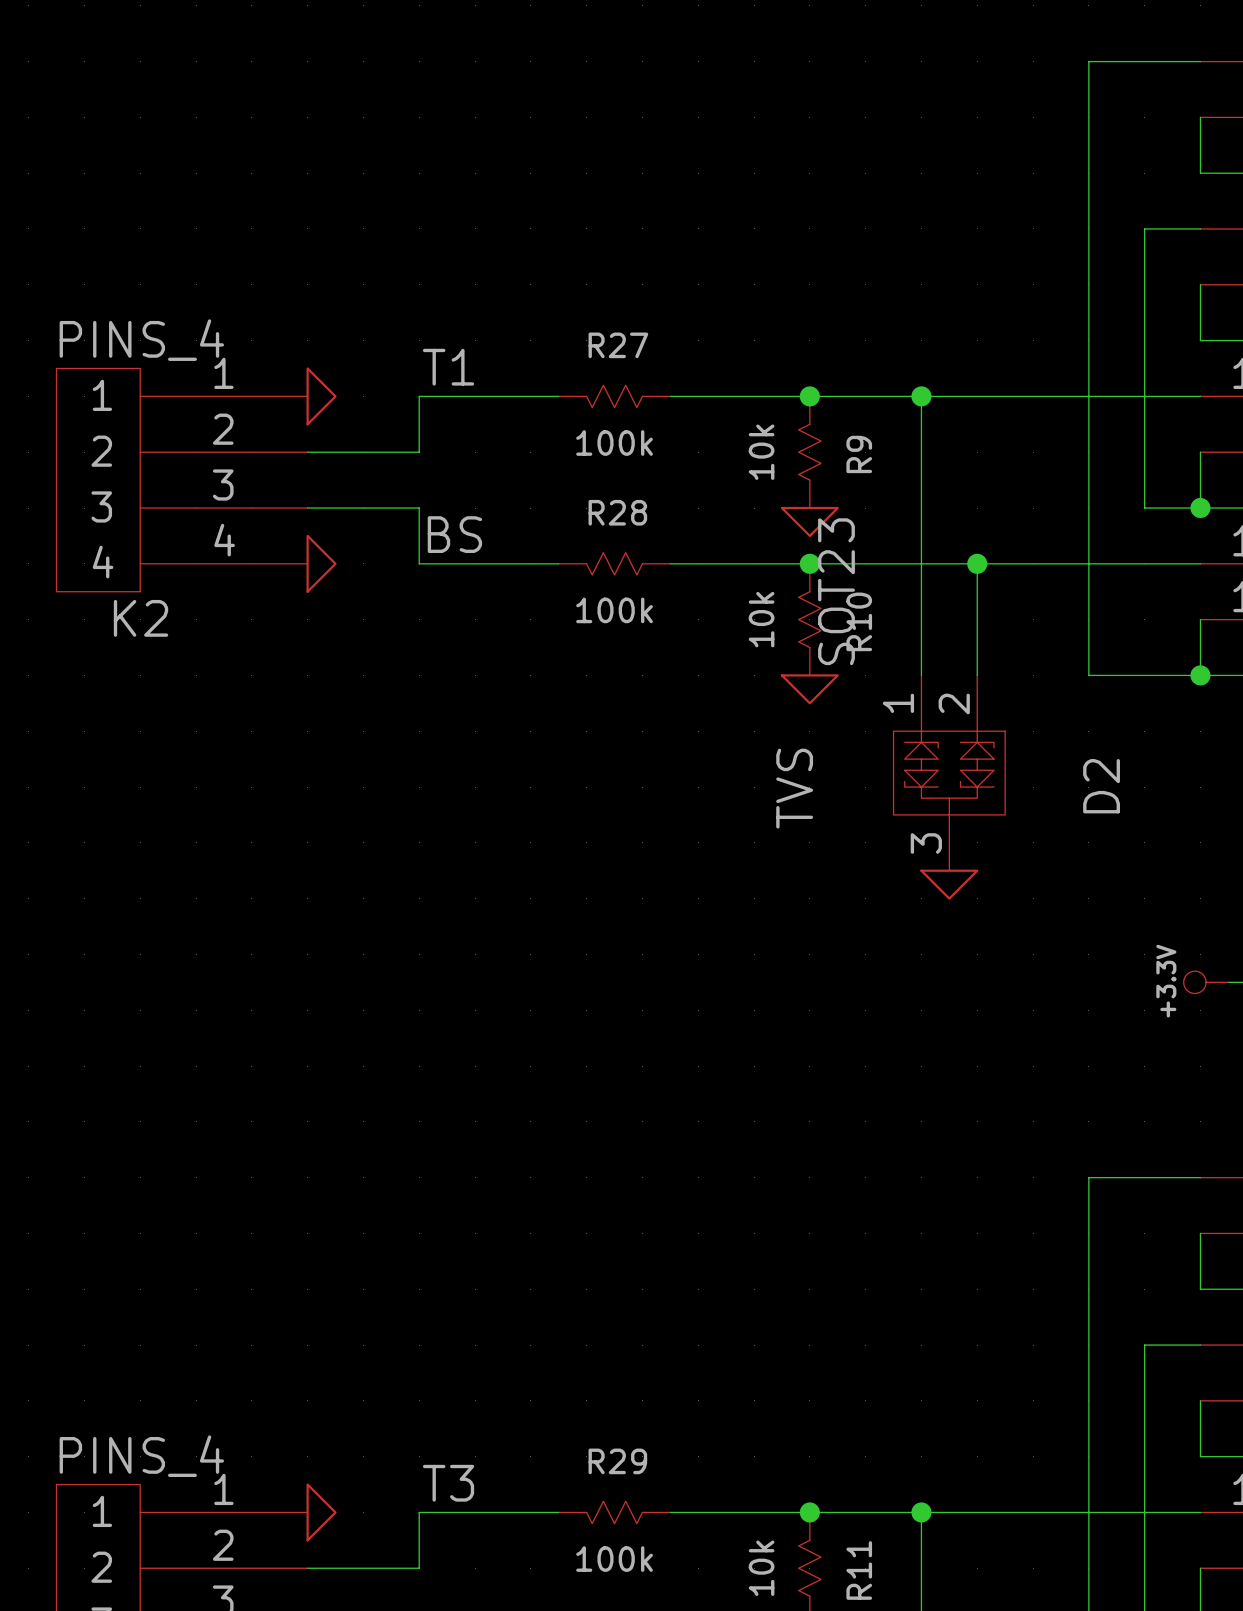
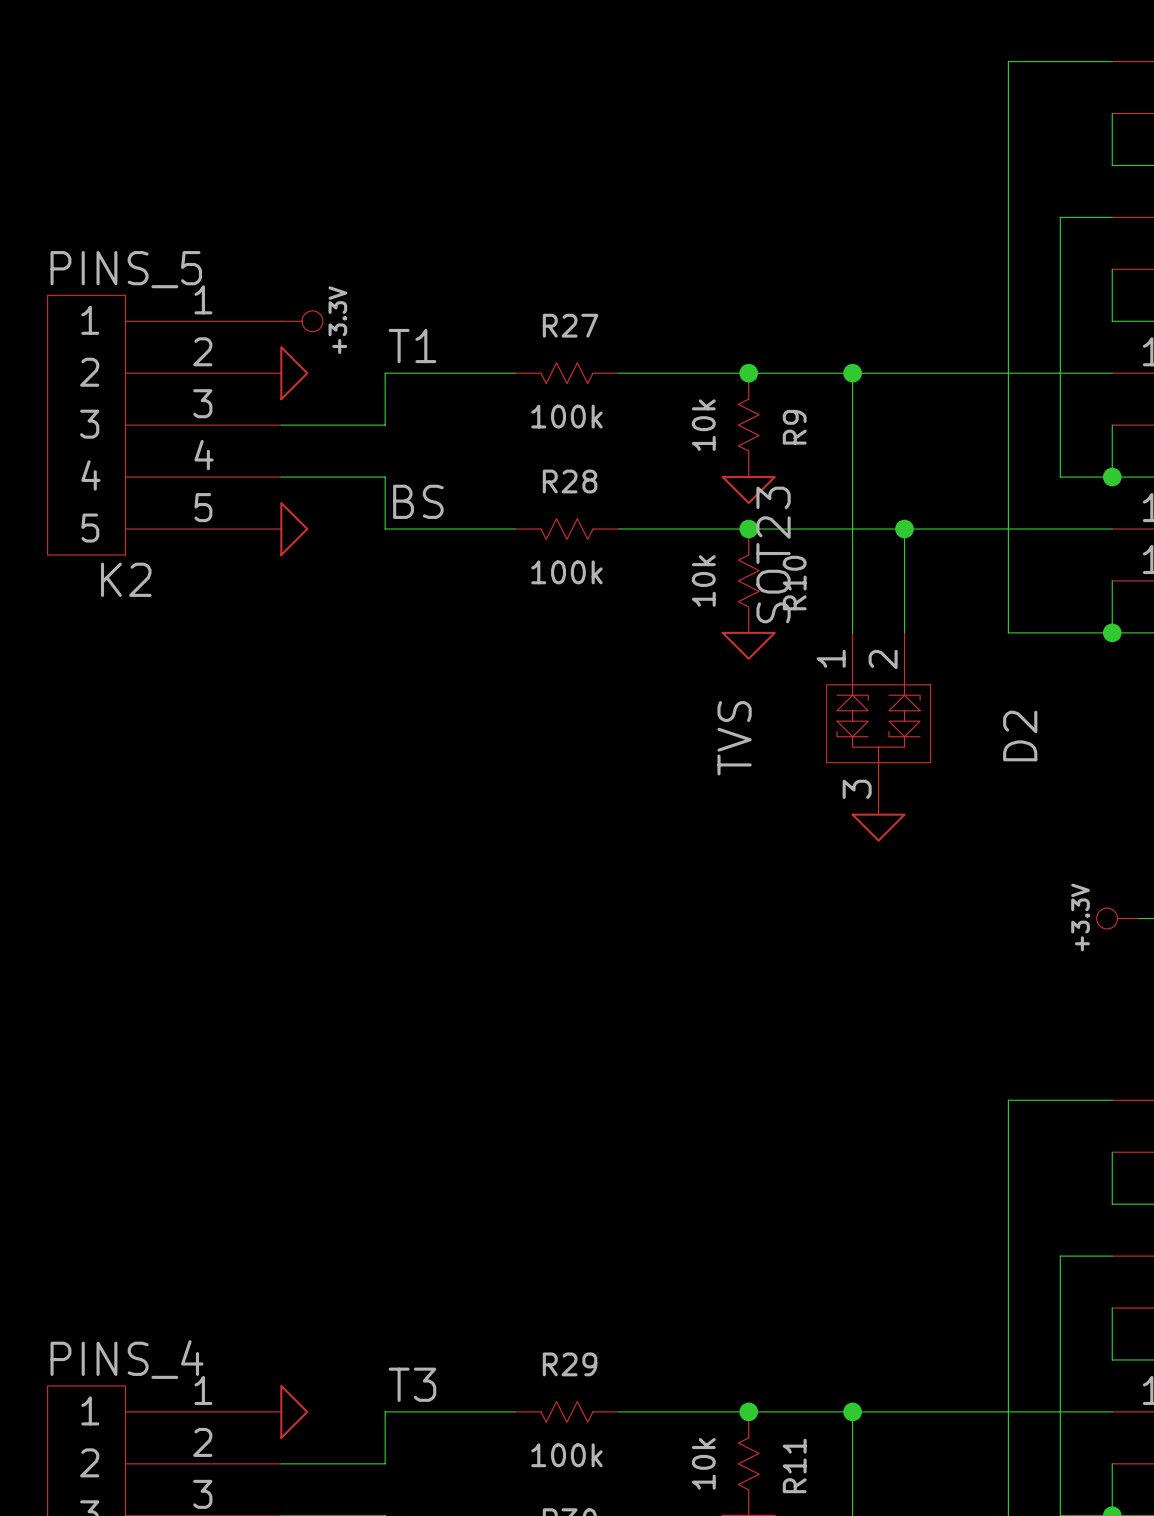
K2 value: PINS_4 (141, 340) -> PINS_5 (126, 269)
power symbol: none -> +3.3V (302, 321)
K2 symbol: [56, 368, 308, 592] -> [47, 295, 282, 555]

